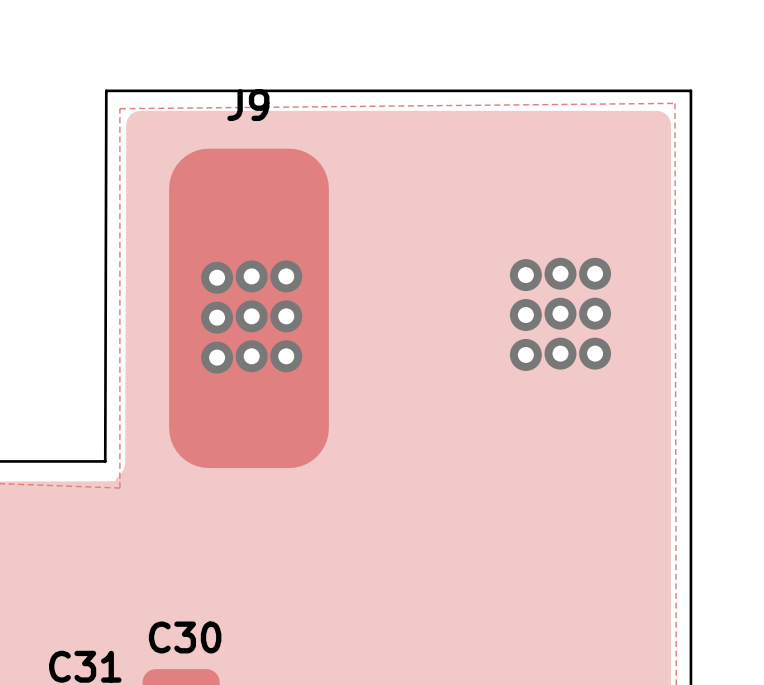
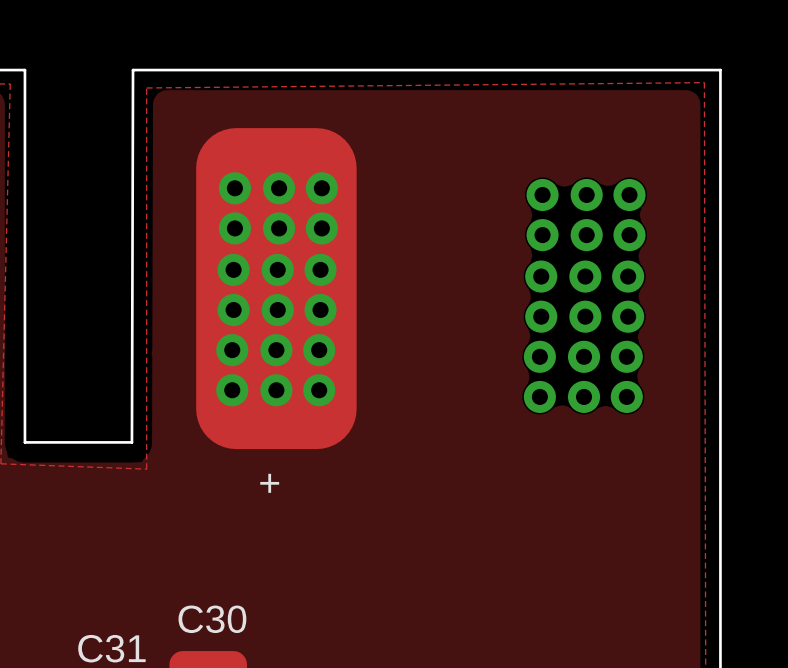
J9 name: J9 (248, 105) -> + (269, 483)
via: none -> (234, 188)
via: none -> (279, 188)
via: none -> (321, 188)
via: none -> (542, 194)
via: none -> (586, 194)
via: none -> (629, 194)
via: none -> (234, 228)
via: none -> (279, 228)
via: none -> (321, 228)
via: none -> (542, 235)
via: none -> (586, 235)
via: none -> (629, 235)
via: (560, 273) -> none
via: (595, 273) -> none
via: (525, 275) -> none
via: (251, 276) -> none
via: (286, 276) -> none
via: (217, 277) -> none
via: none -> (233, 269)
via: none -> (277, 269)
via: none -> (320, 269)
via: none -> (541, 276)
via: none -> (585, 276)
via: none -> (628, 276)
via: (560, 313) -> none
via: (595, 313) -> none
via: (525, 315) -> none
via: (251, 316) -> none
via: (286, 316) -> none
via: (217, 317) -> none
via: none -> (233, 310)
via: none -> (277, 310)
via: none -> (320, 310)
via: none -> (541, 316)
via: none -> (585, 316)
via: none -> (628, 316)
via: (560, 353) -> none
via: (595, 353) -> none
via: (525, 354) -> none
via: (251, 356) -> none
via: (286, 356) -> none
via: (217, 357) -> none
via: none -> (232, 350)
via: none -> (276, 350)
via: none -> (319, 350)
via: none -> (539, 356)
via: none -> (584, 356)
via: none -> (626, 356)
via: none -> (232, 390)
via: none -> (276, 390)
via: none -> (319, 390)
via: none -> (539, 396)
via: none -> (584, 396)
via: none -> (626, 396)

